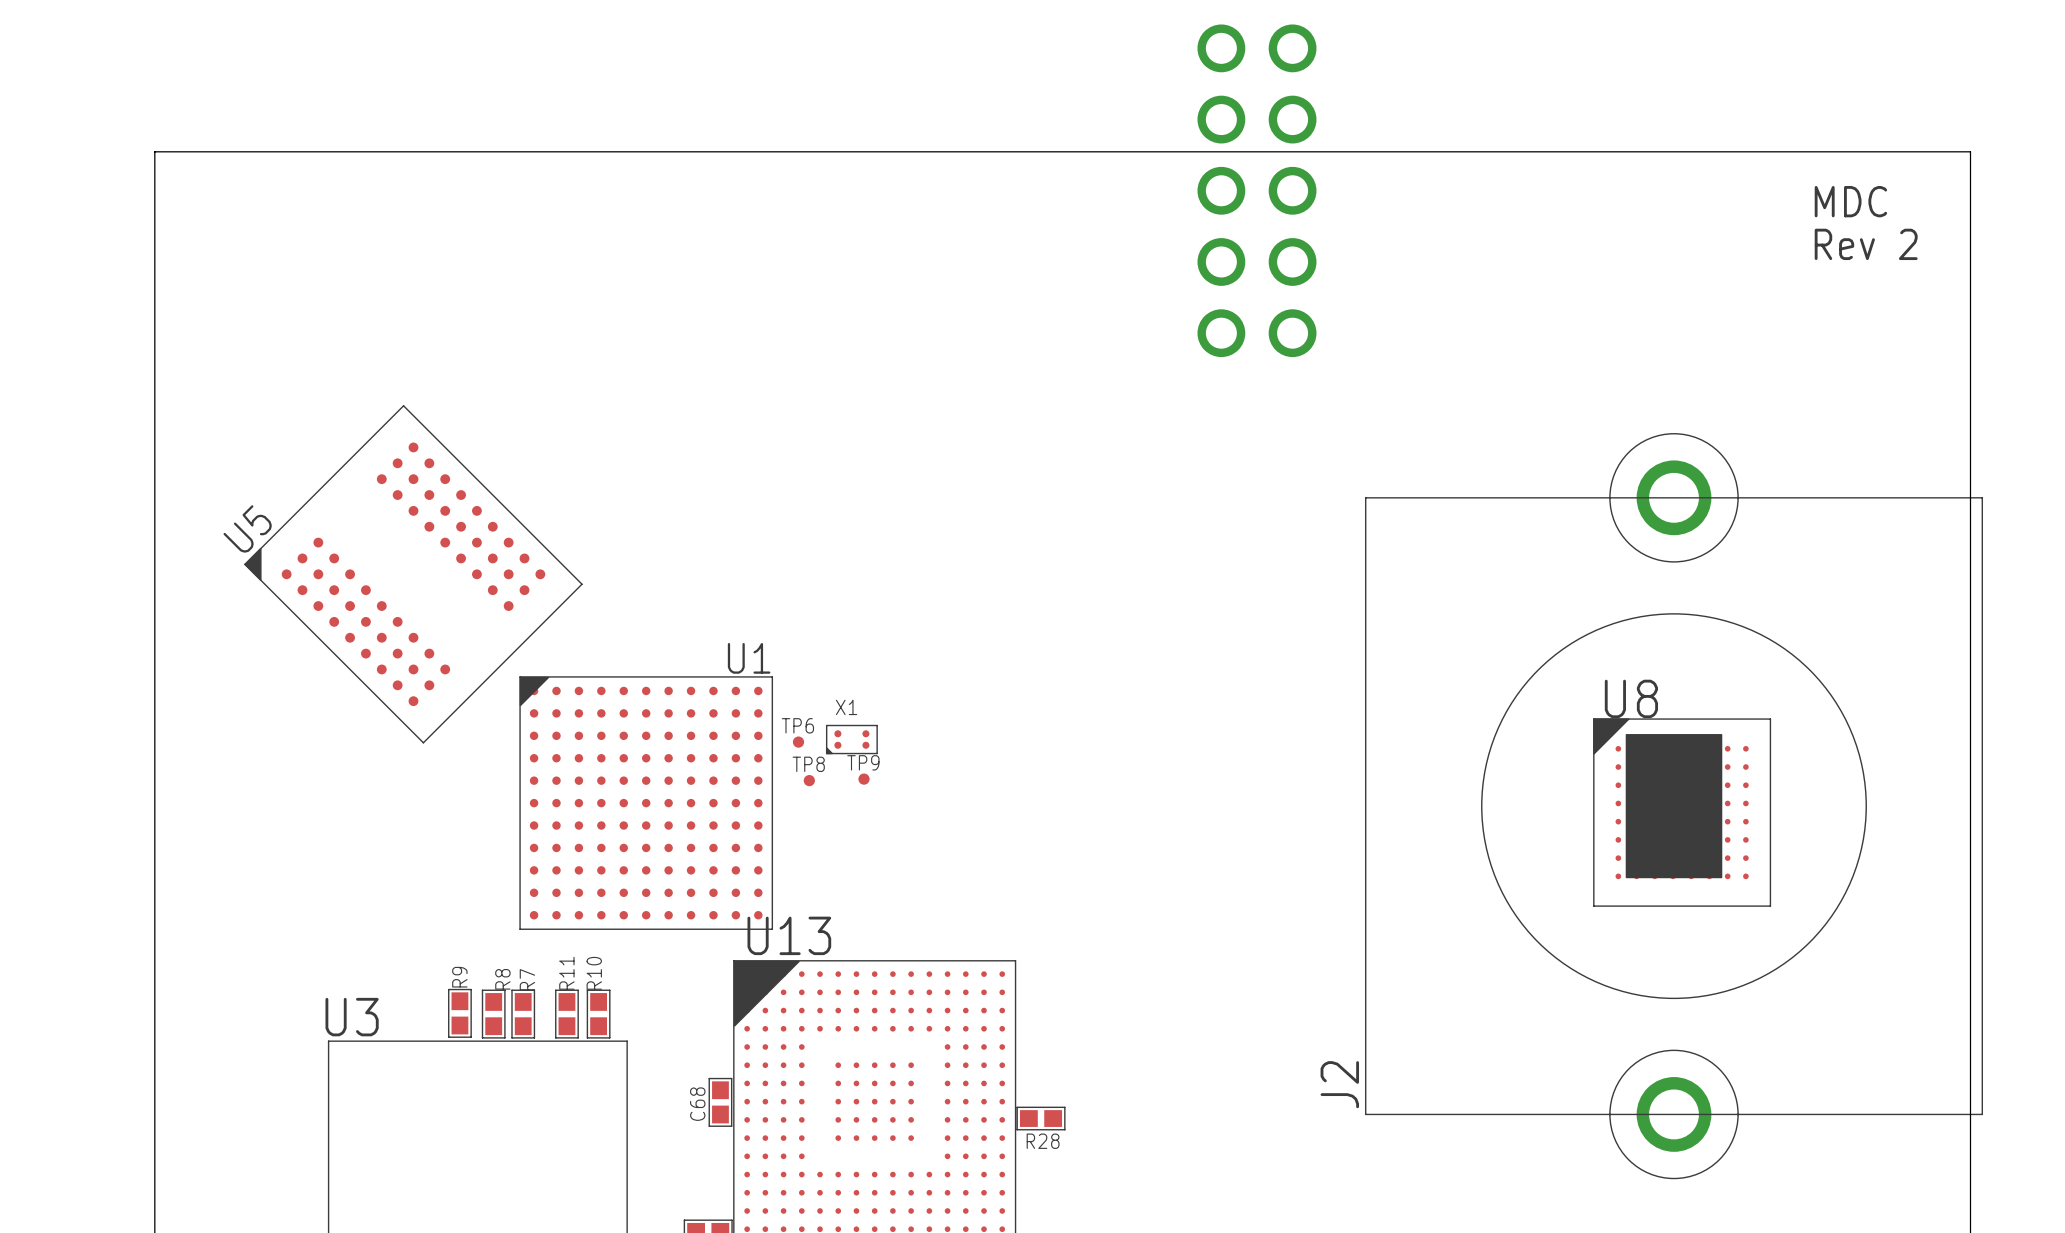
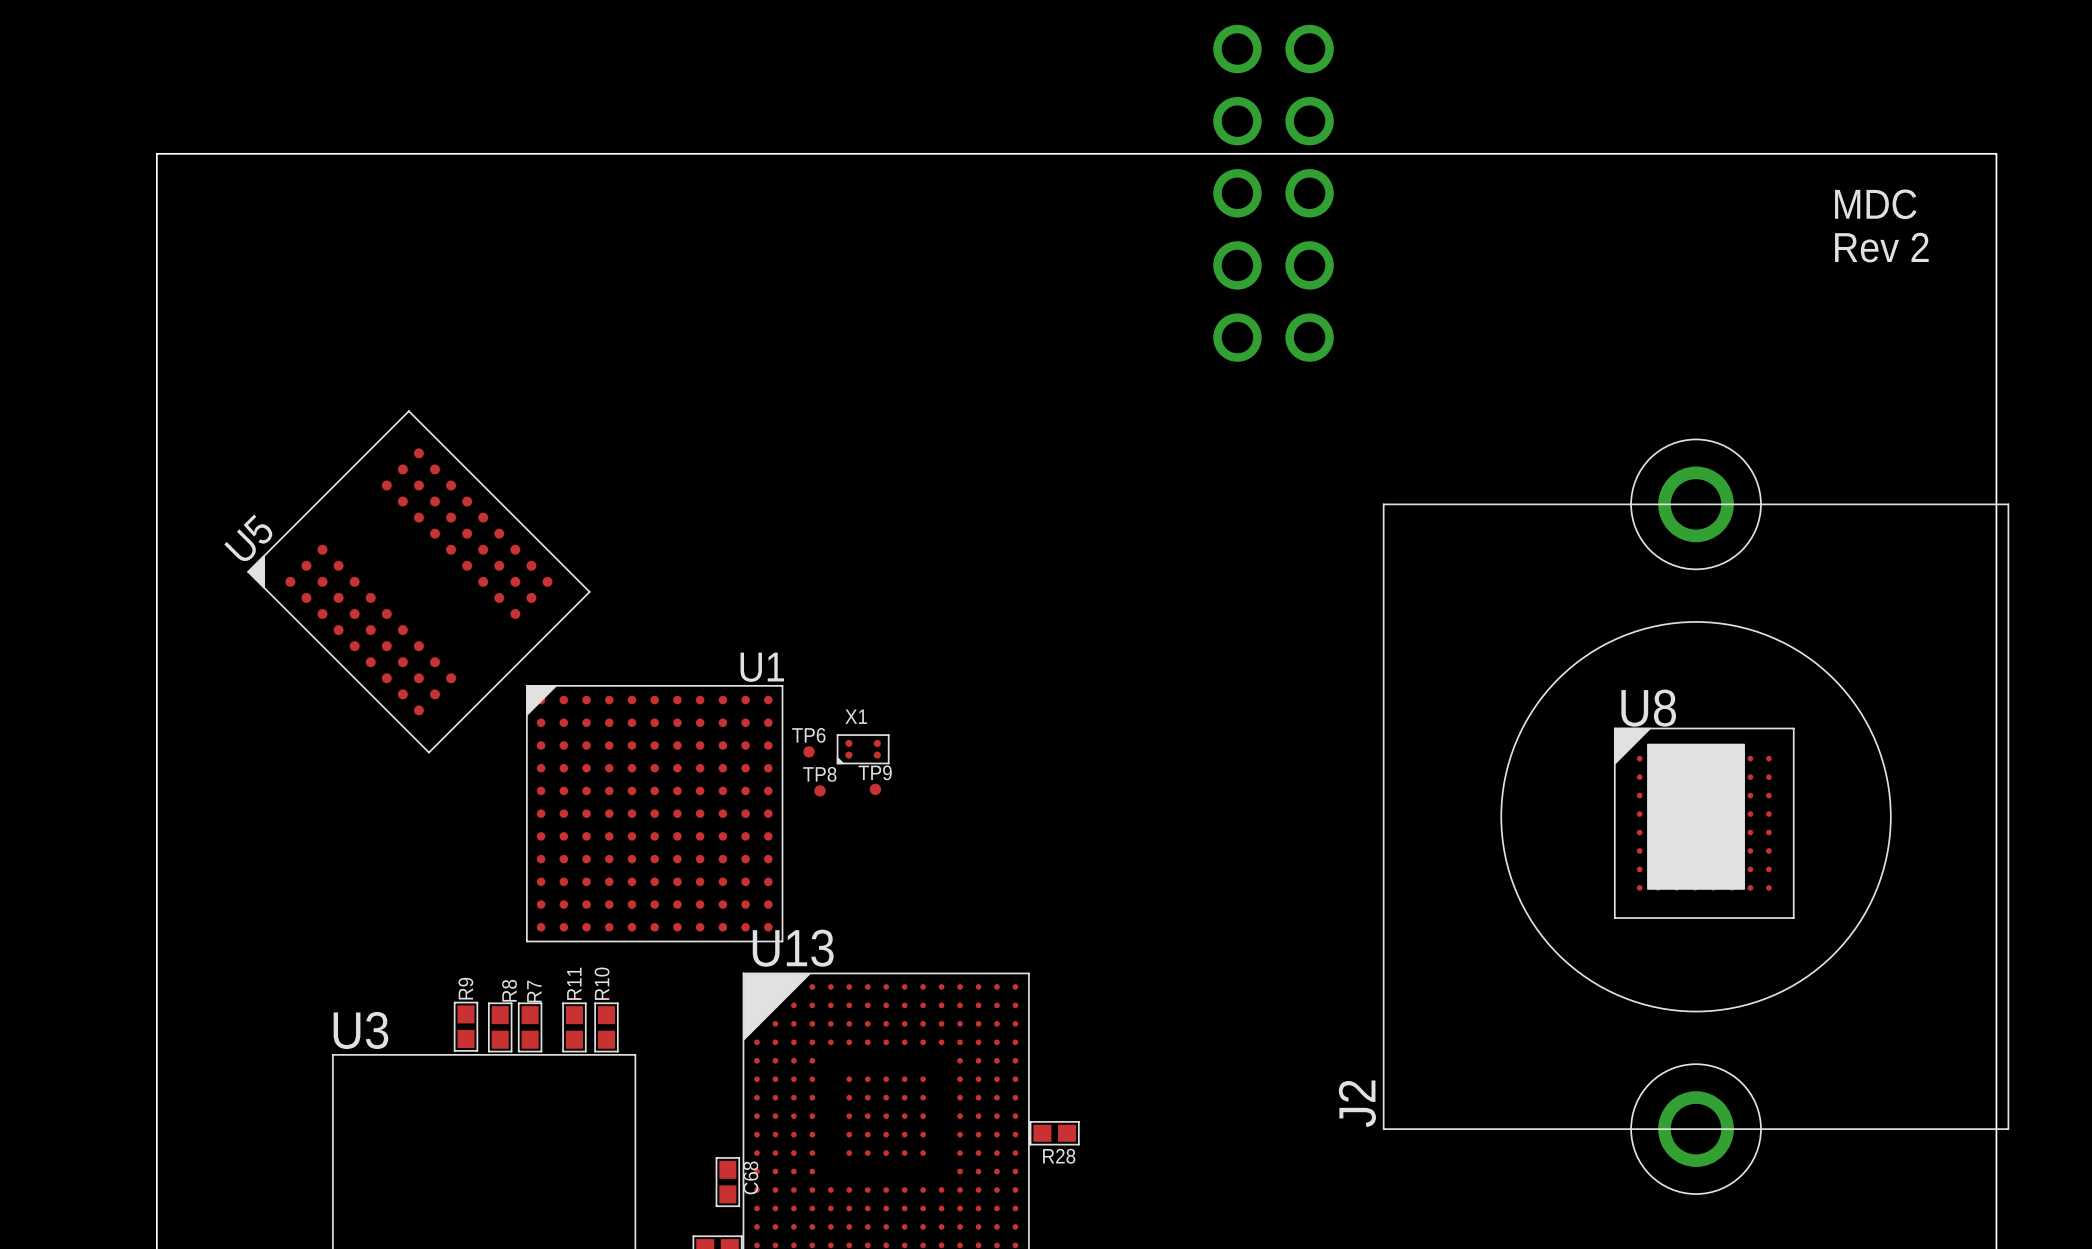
C68 position: (720, 1102) -> (727, 1182)
C68 name position: C68 (697, 1104) -> C68 (750, 1177)

